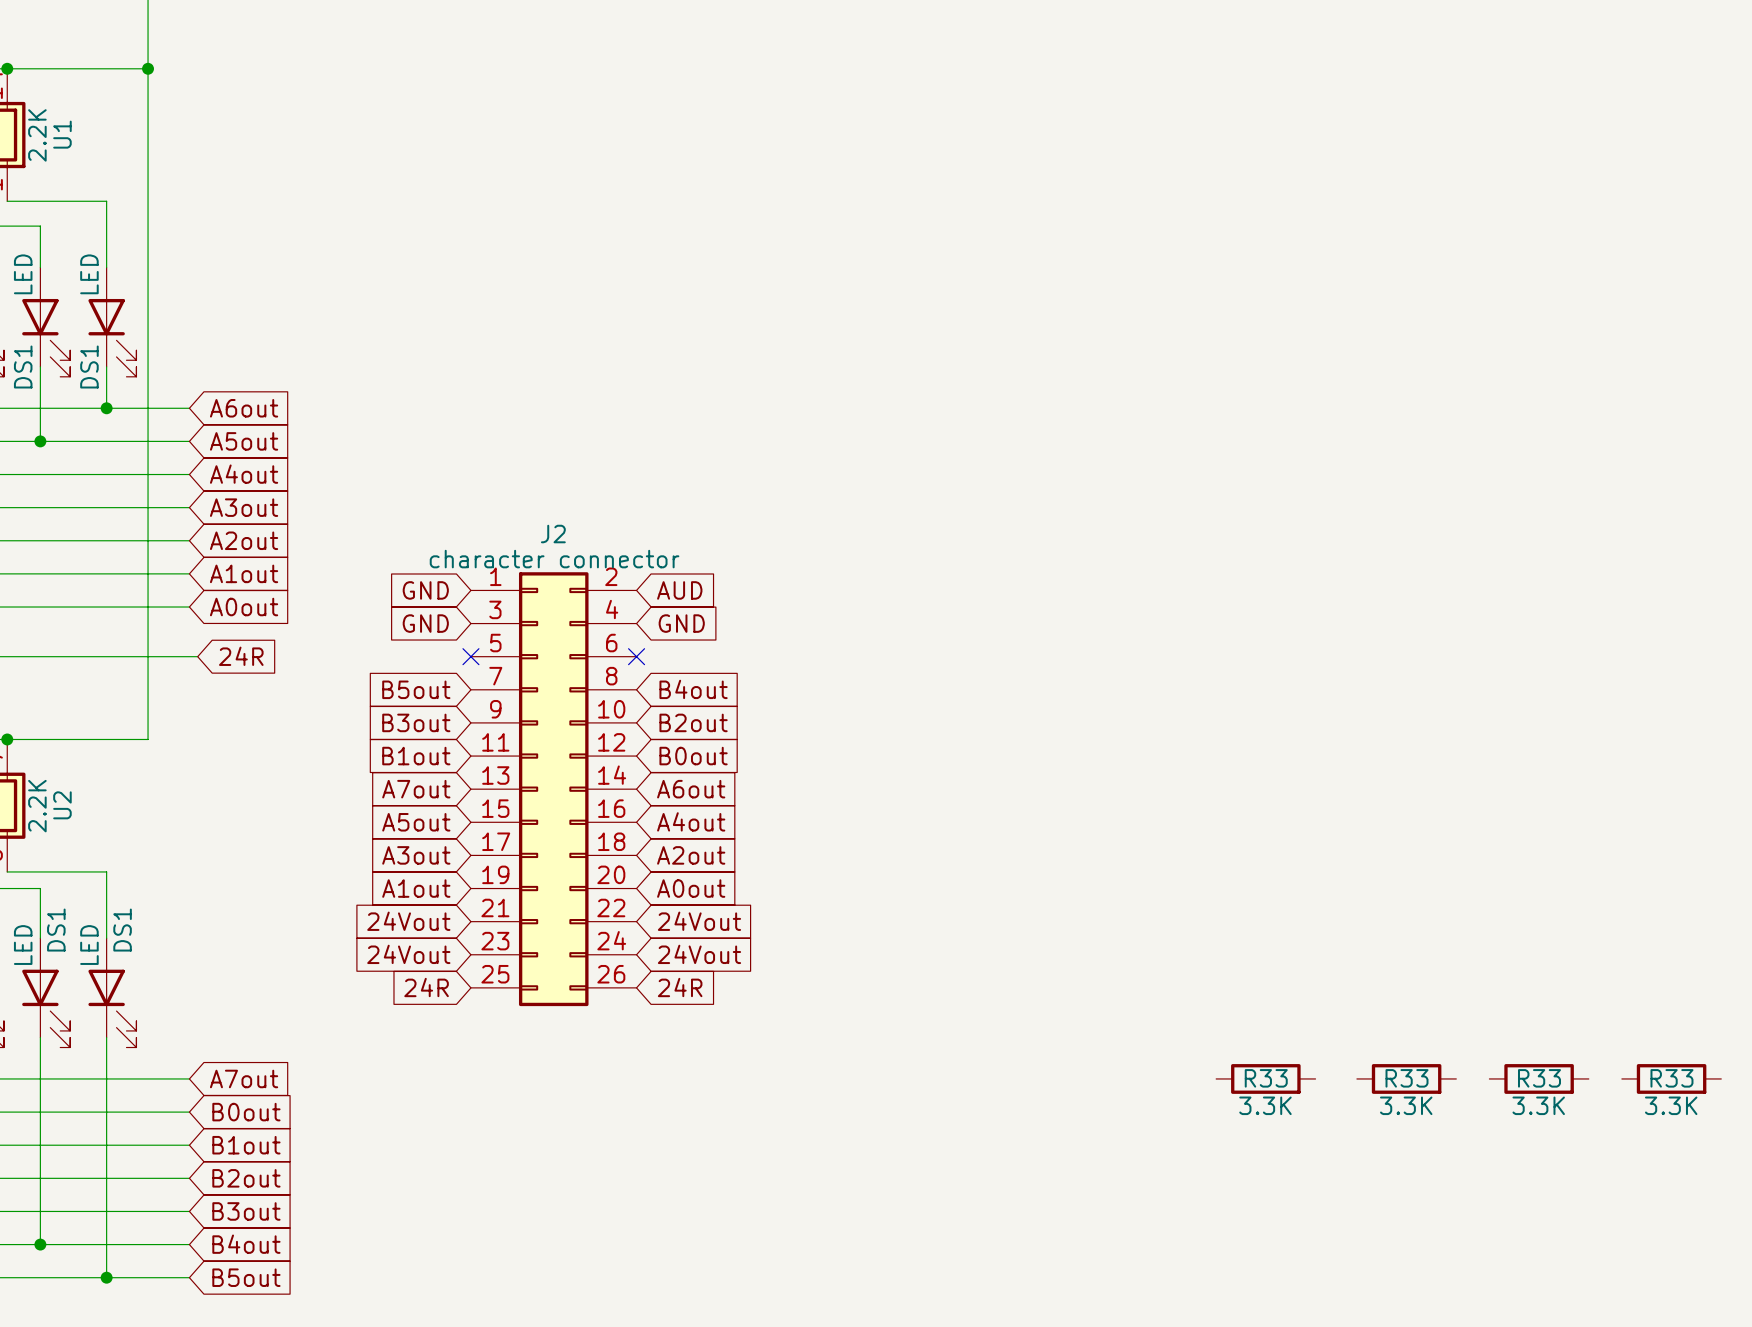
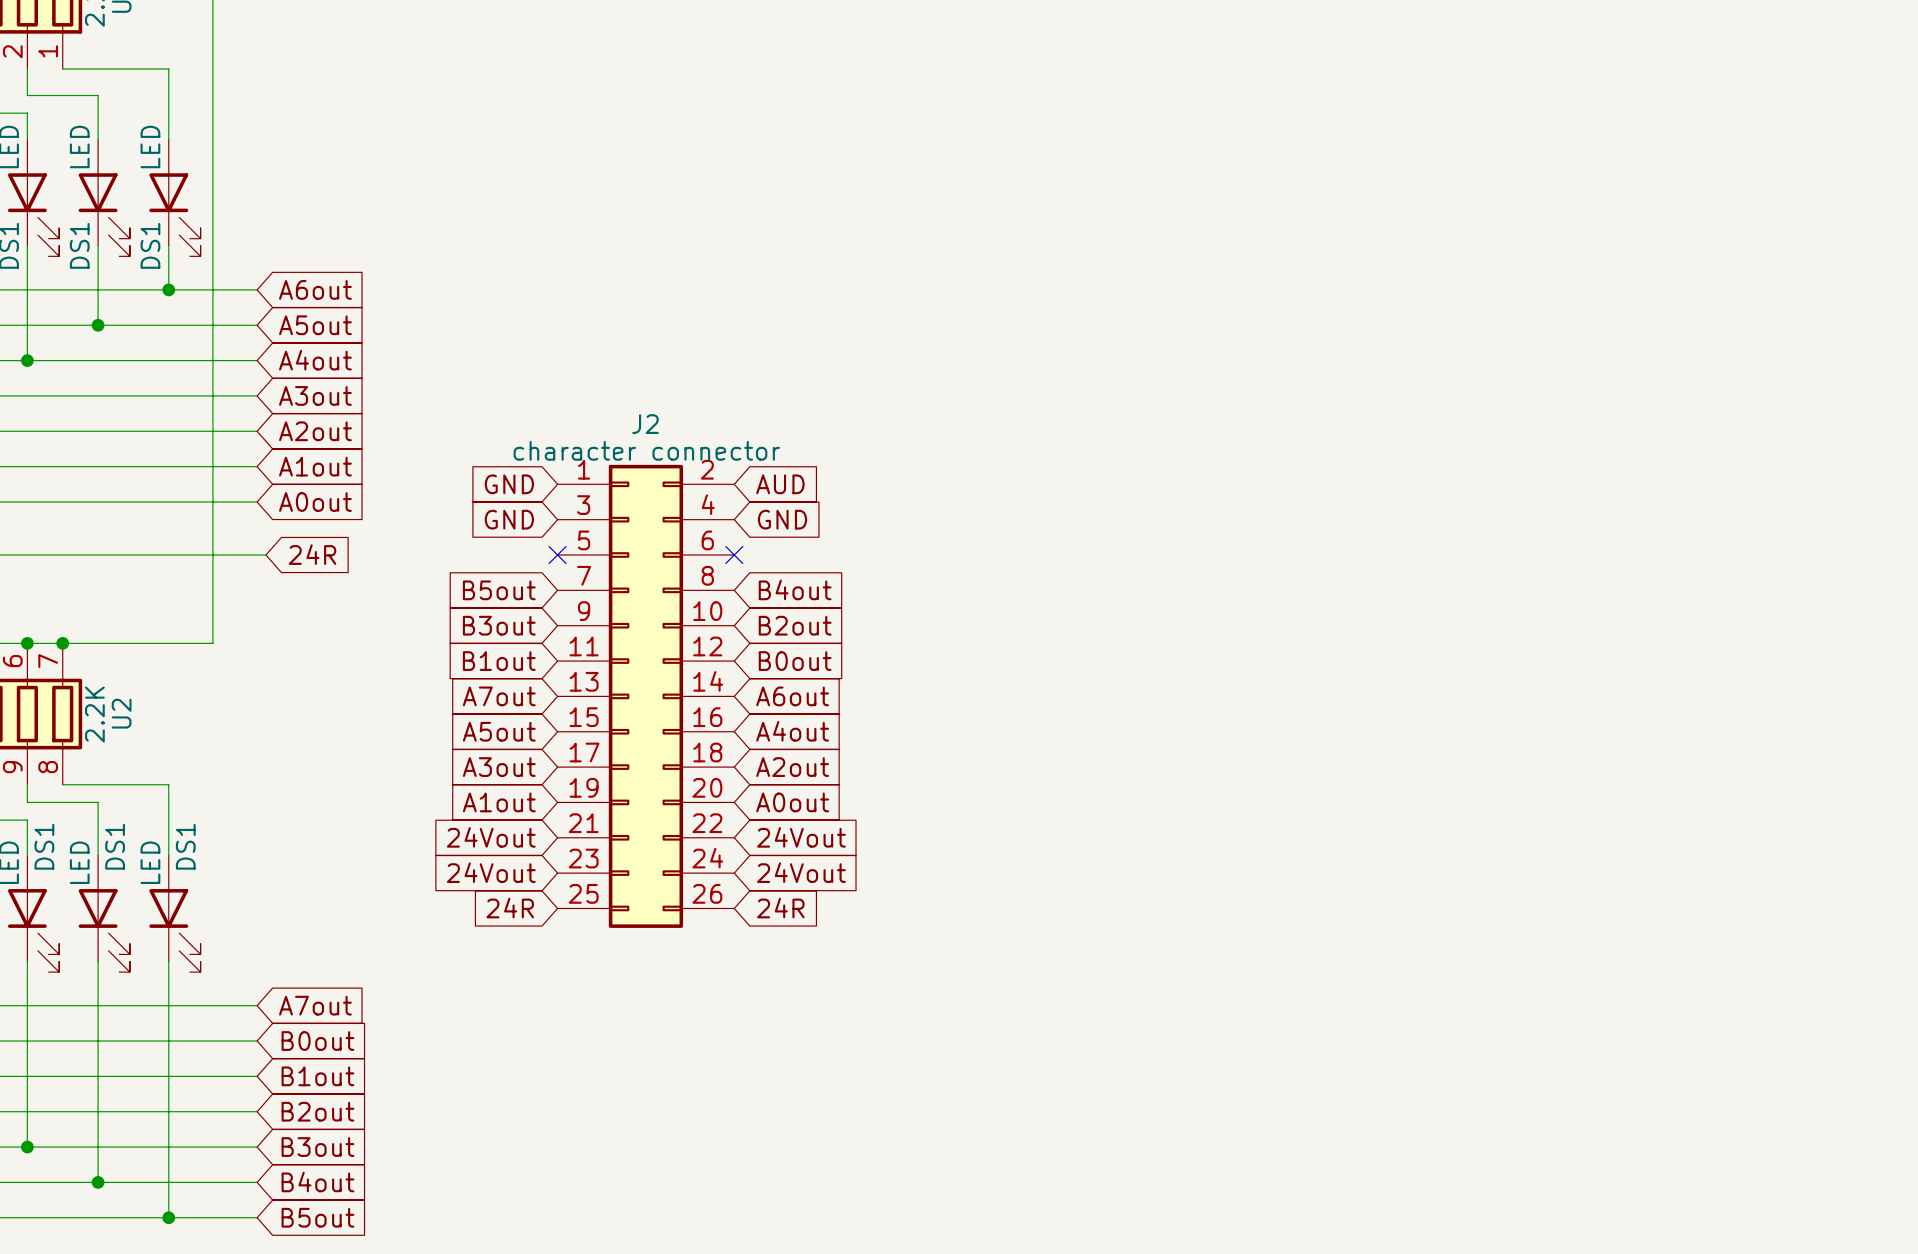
R33: 3.3K (1265, 1078) -> none
R33: 3.3K (1406, 1078) -> none
R33: 3.3K (1539, 1078) -> none
R33: 3.3K (1671, 1078) -> none

